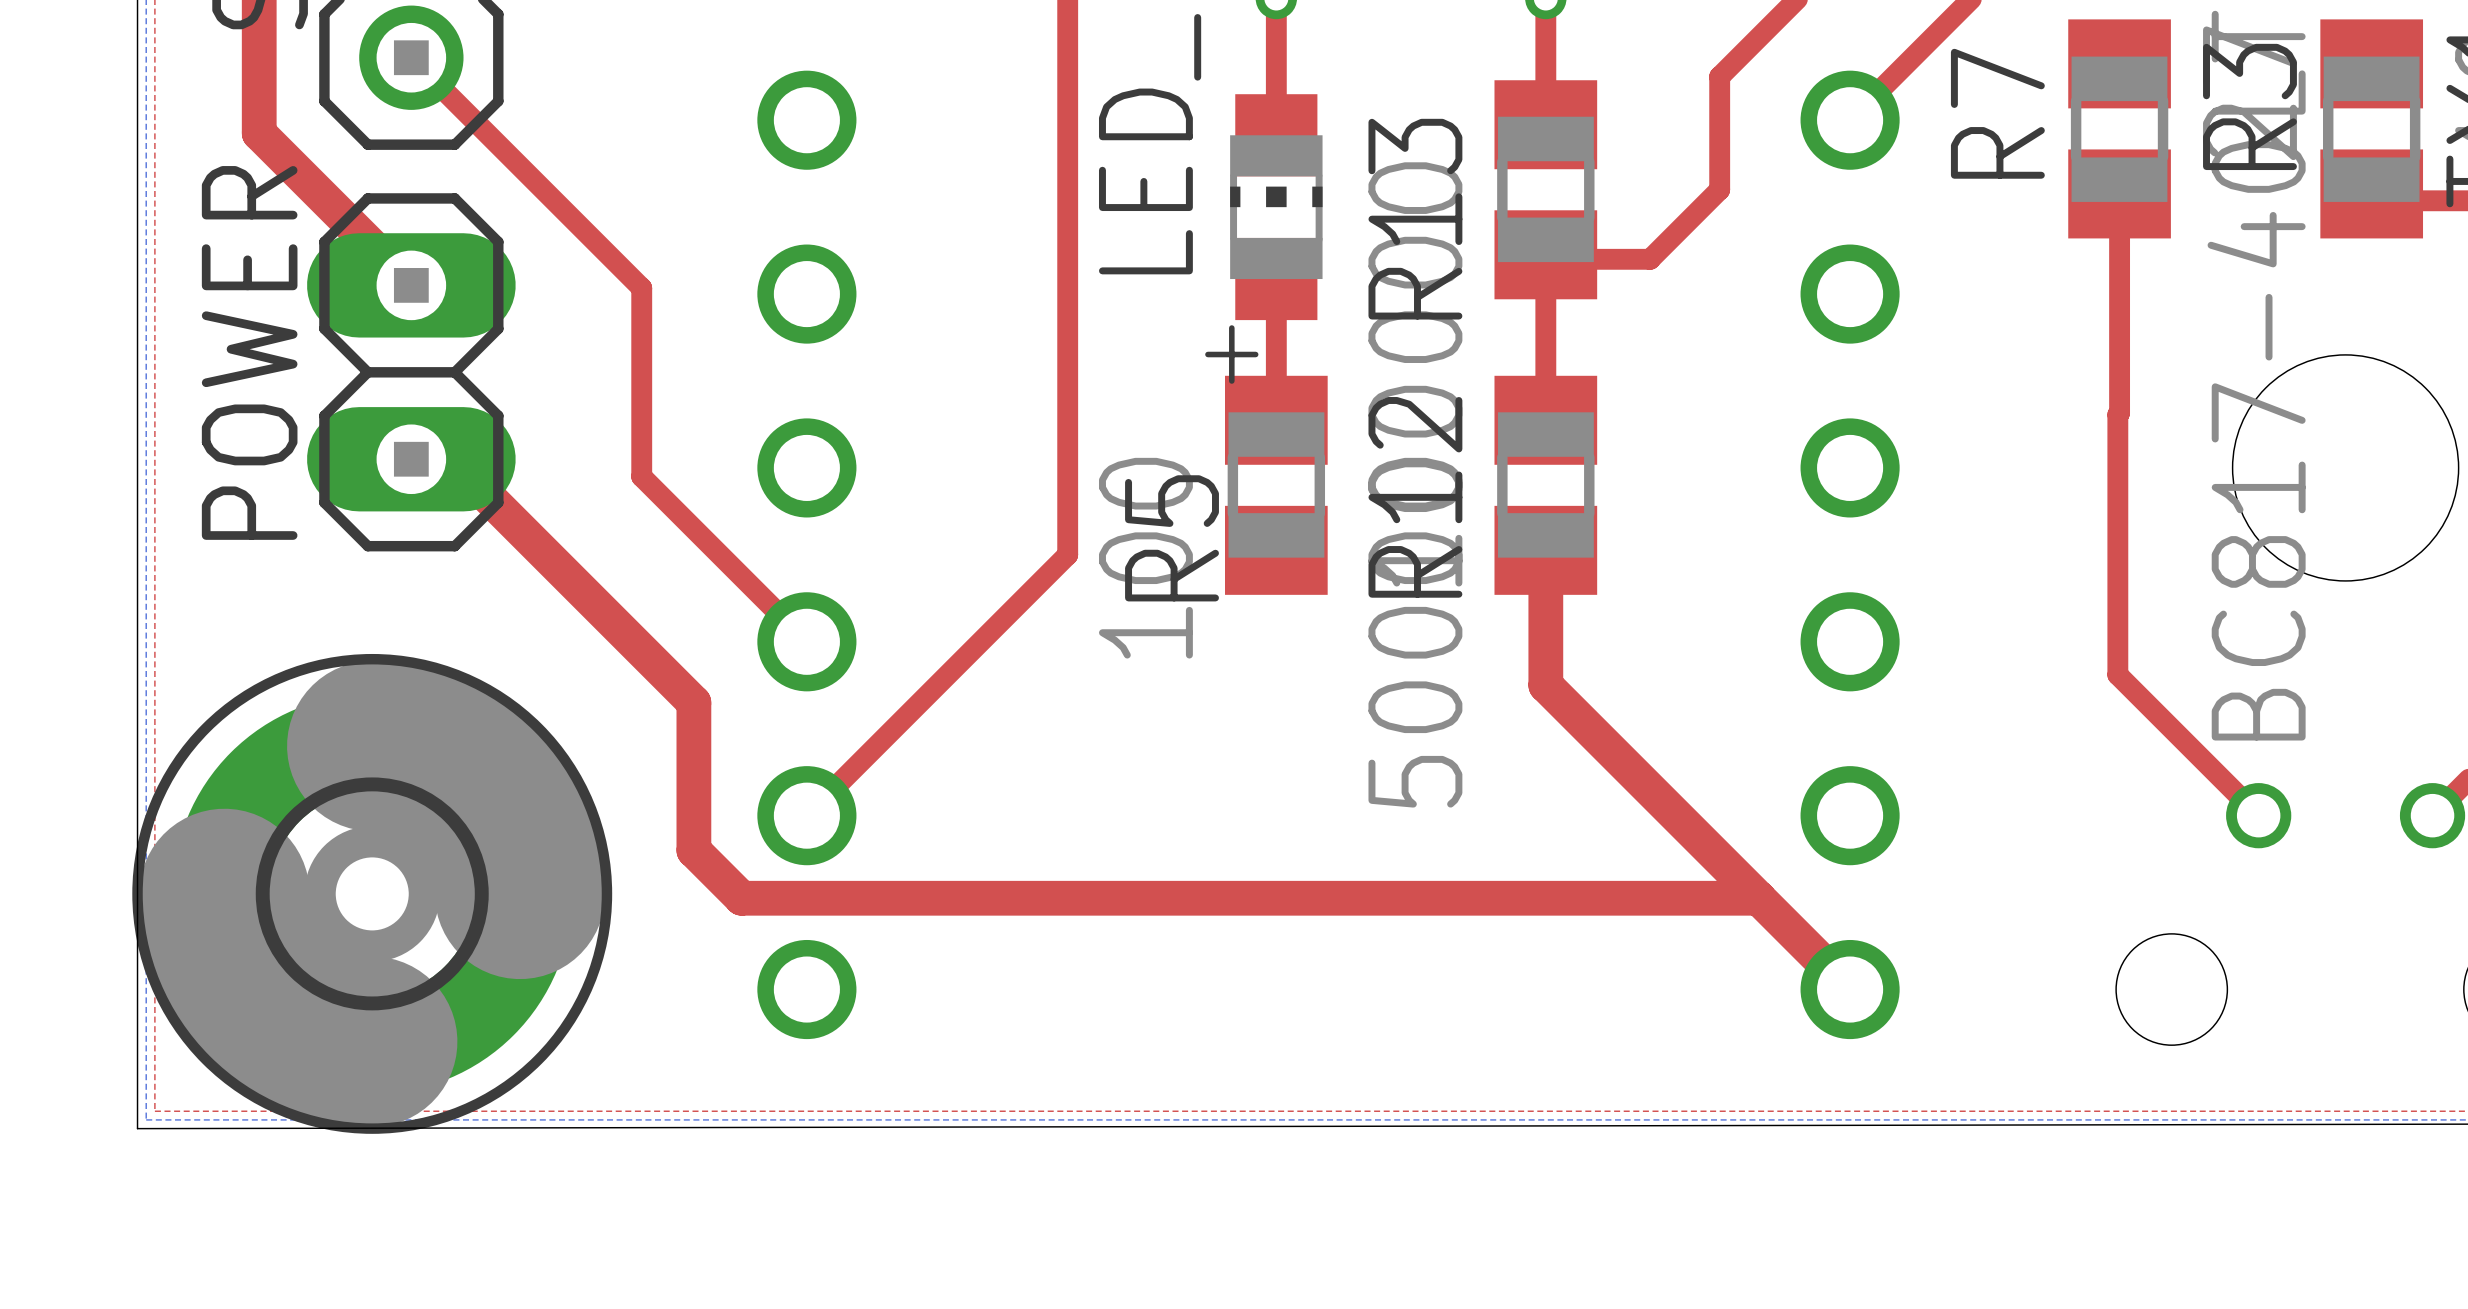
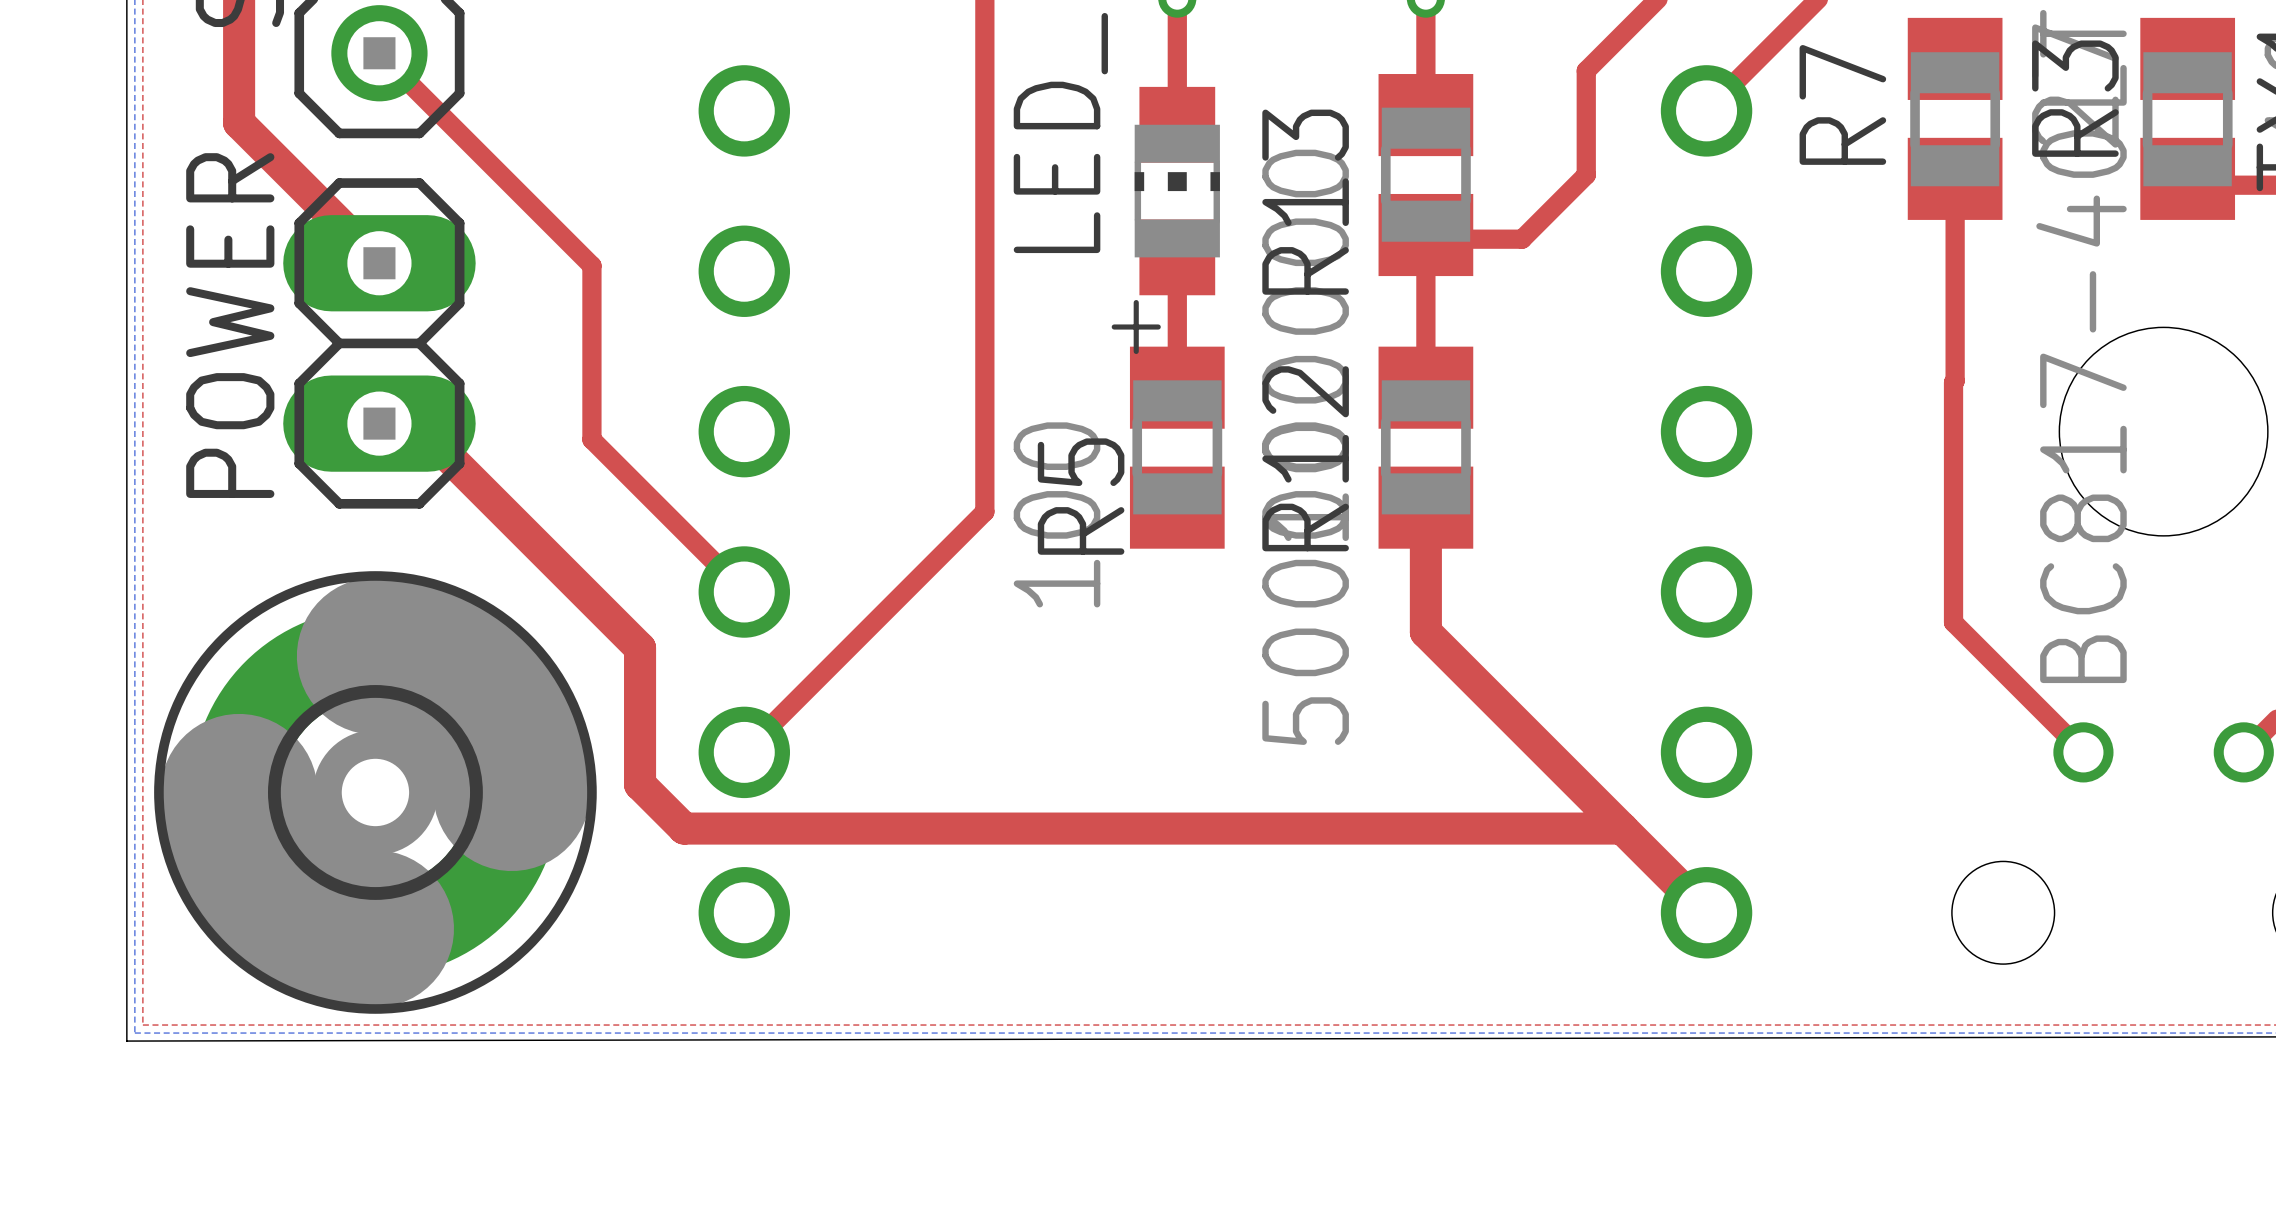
part position: (372, 893) -> (375, 792)

